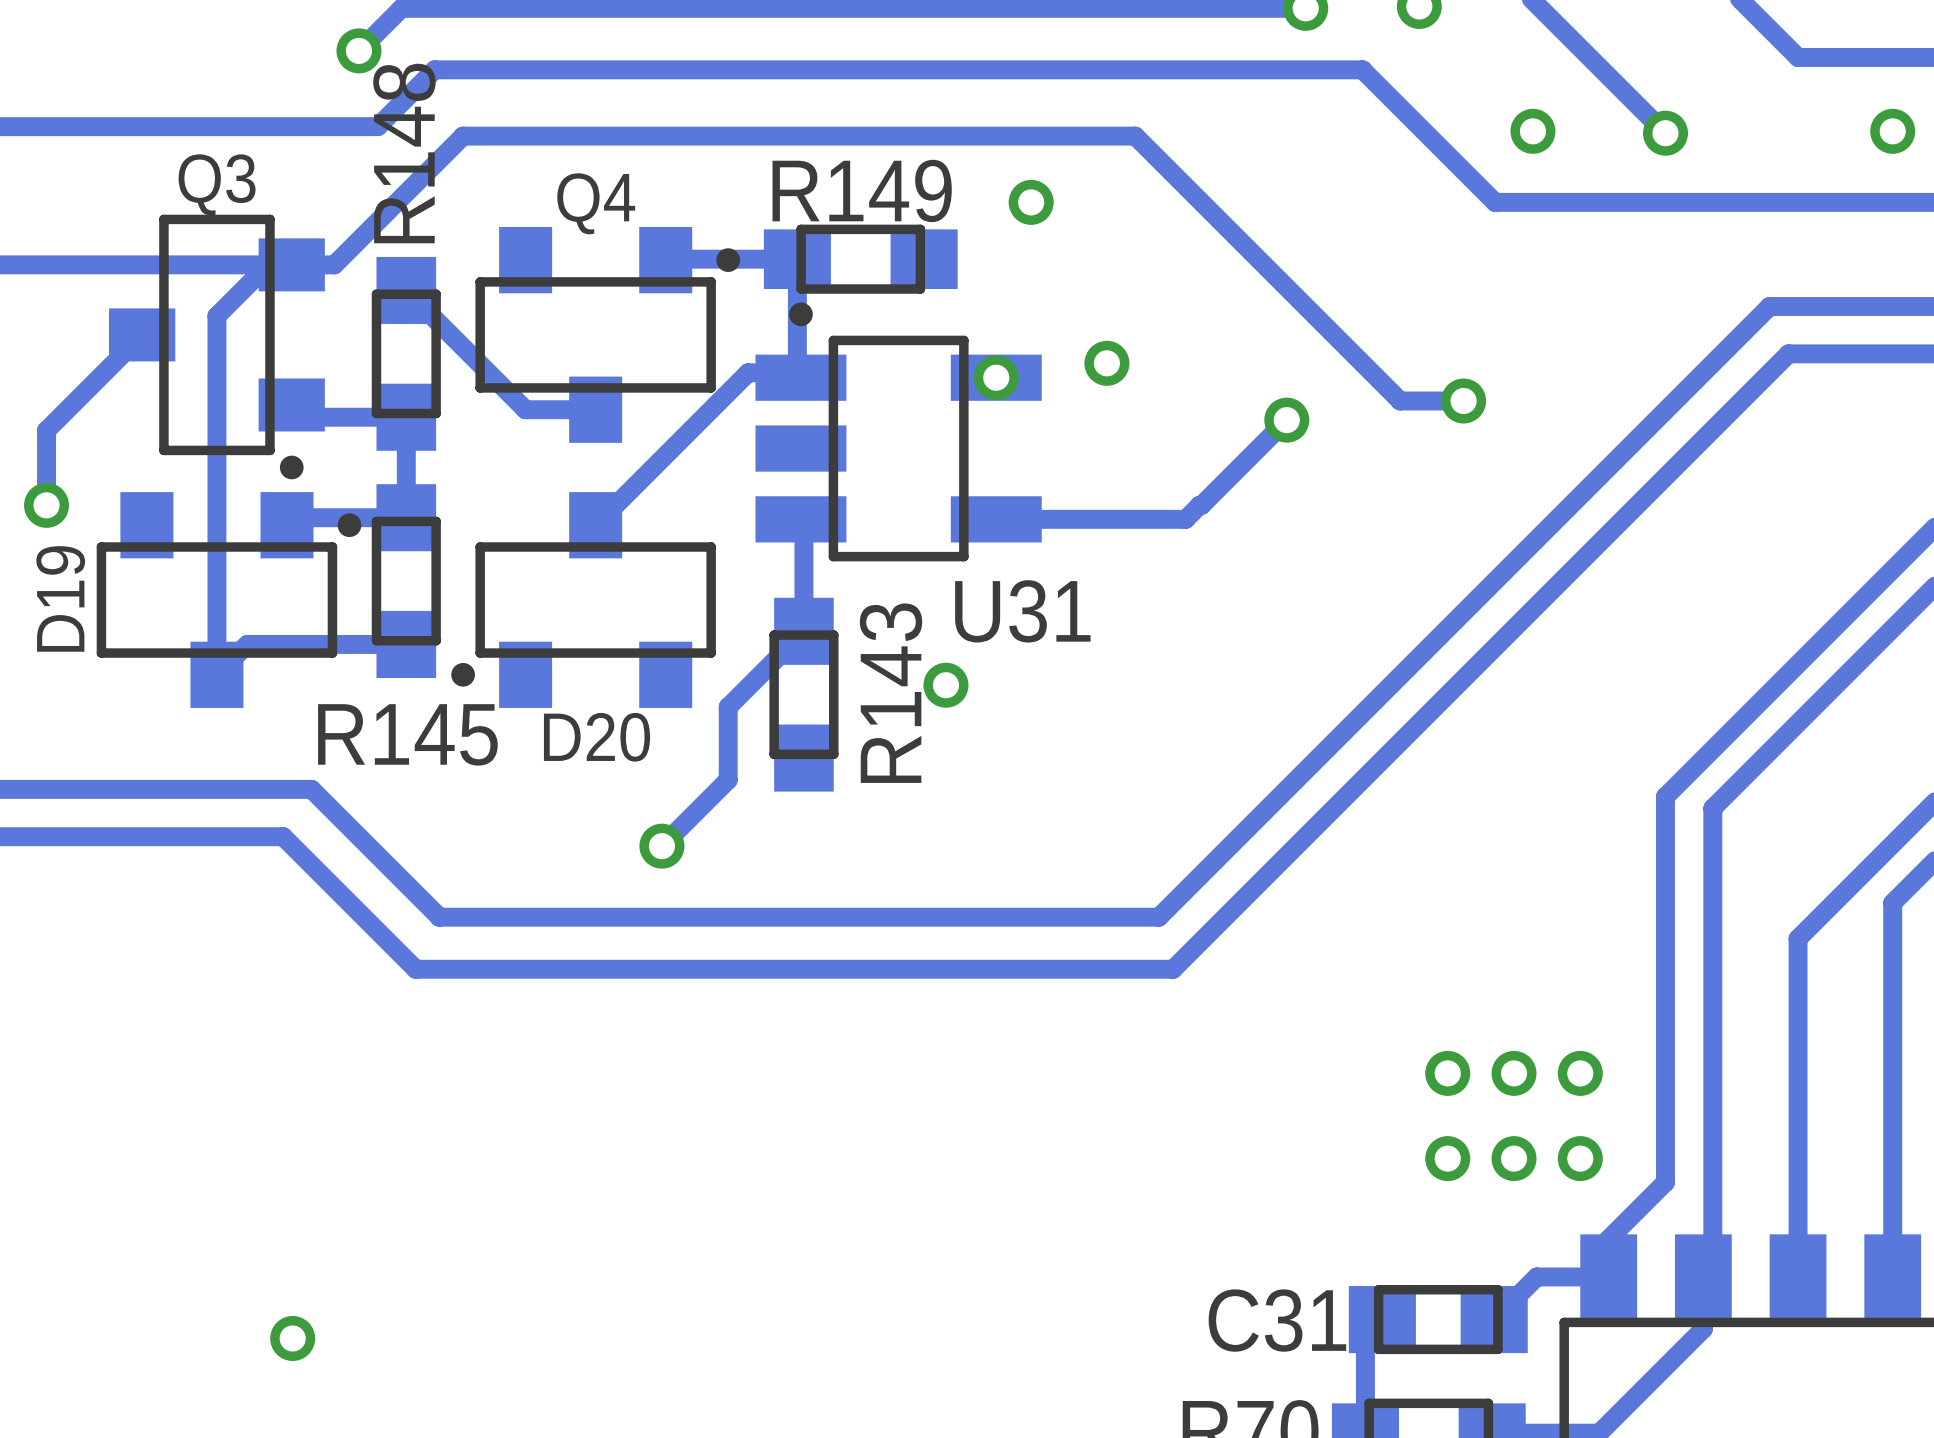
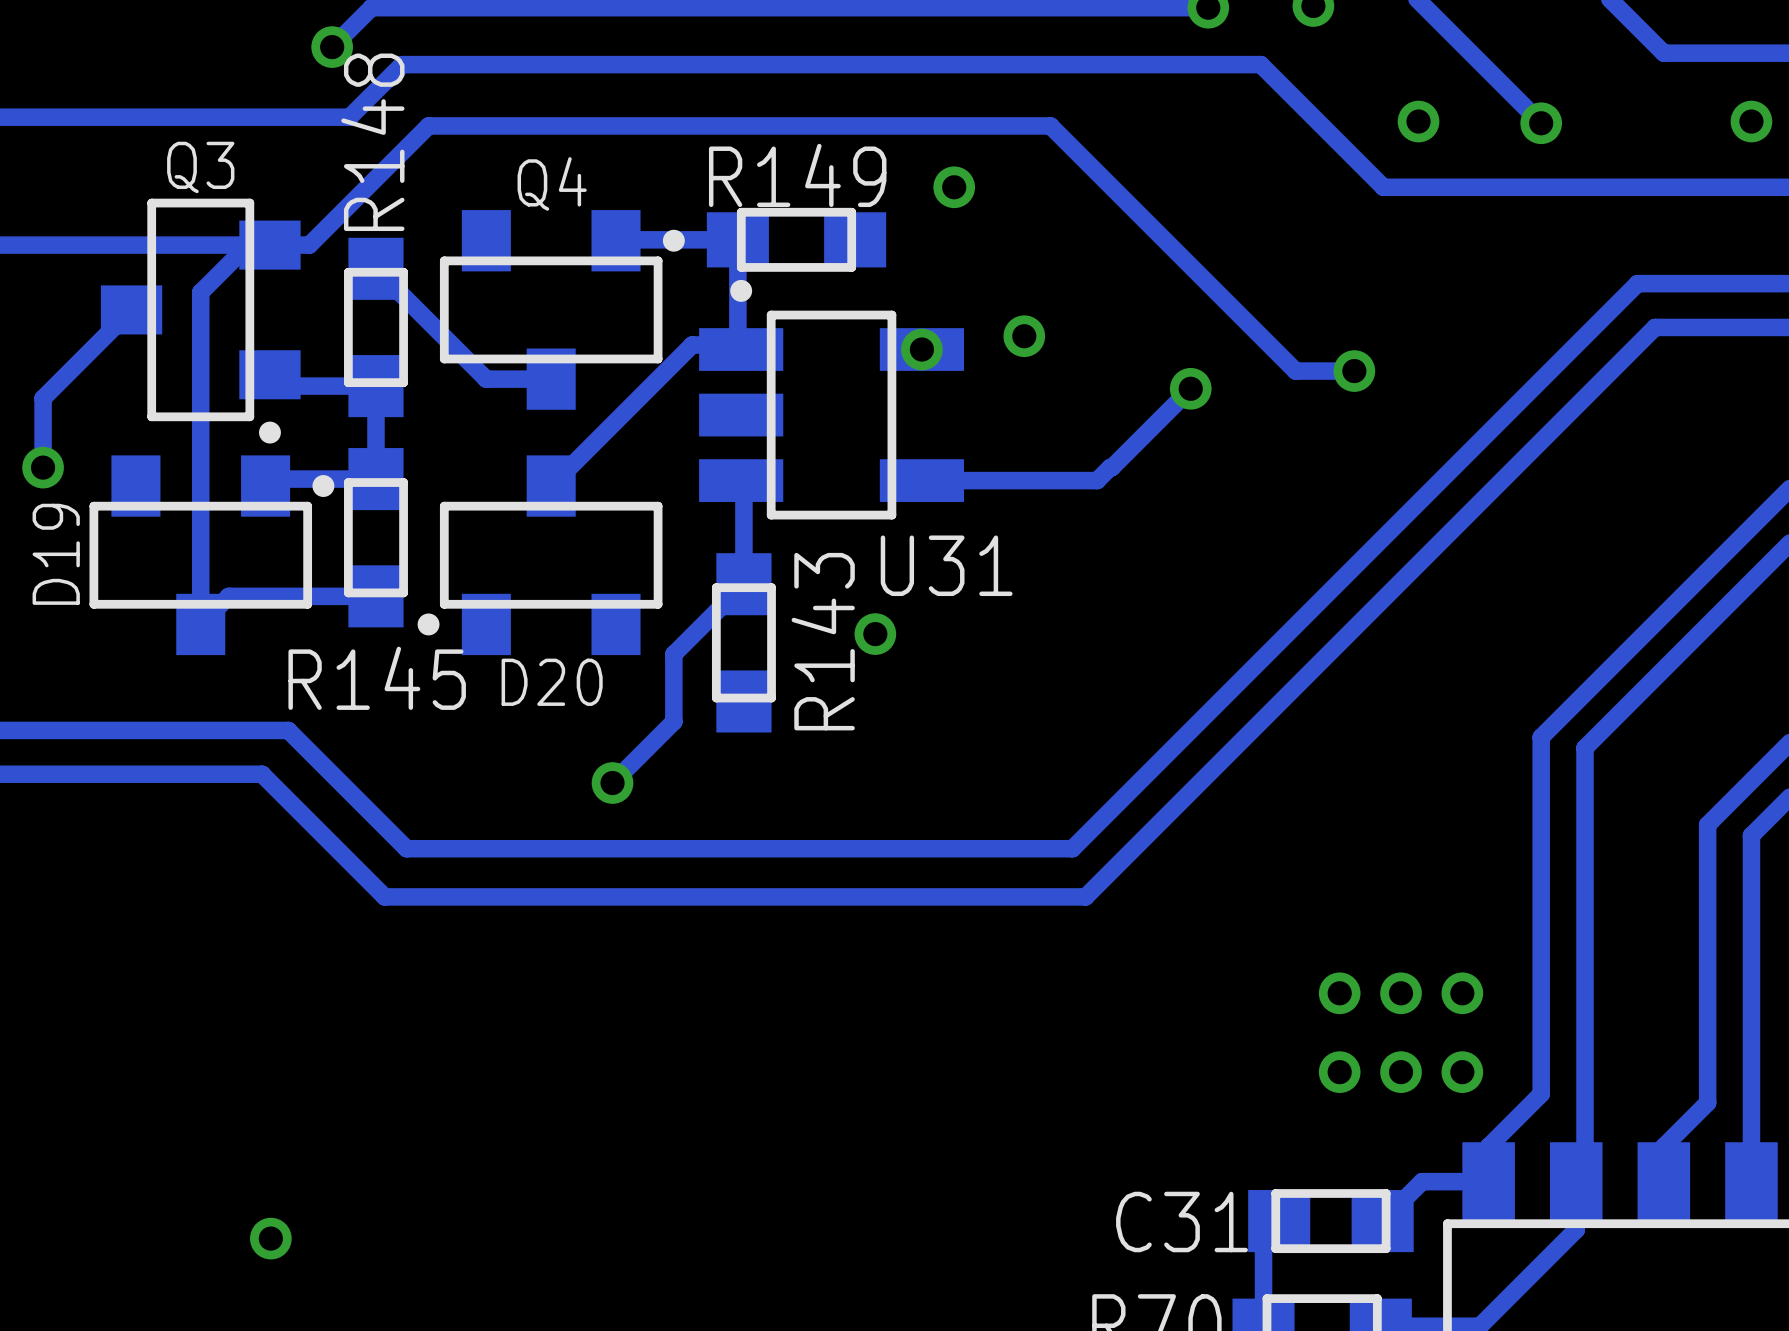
track: (1845, 891) (1798, 938) (1798, 1239) -> (1707, 824) (1707, 1102) (1663, 1146)

